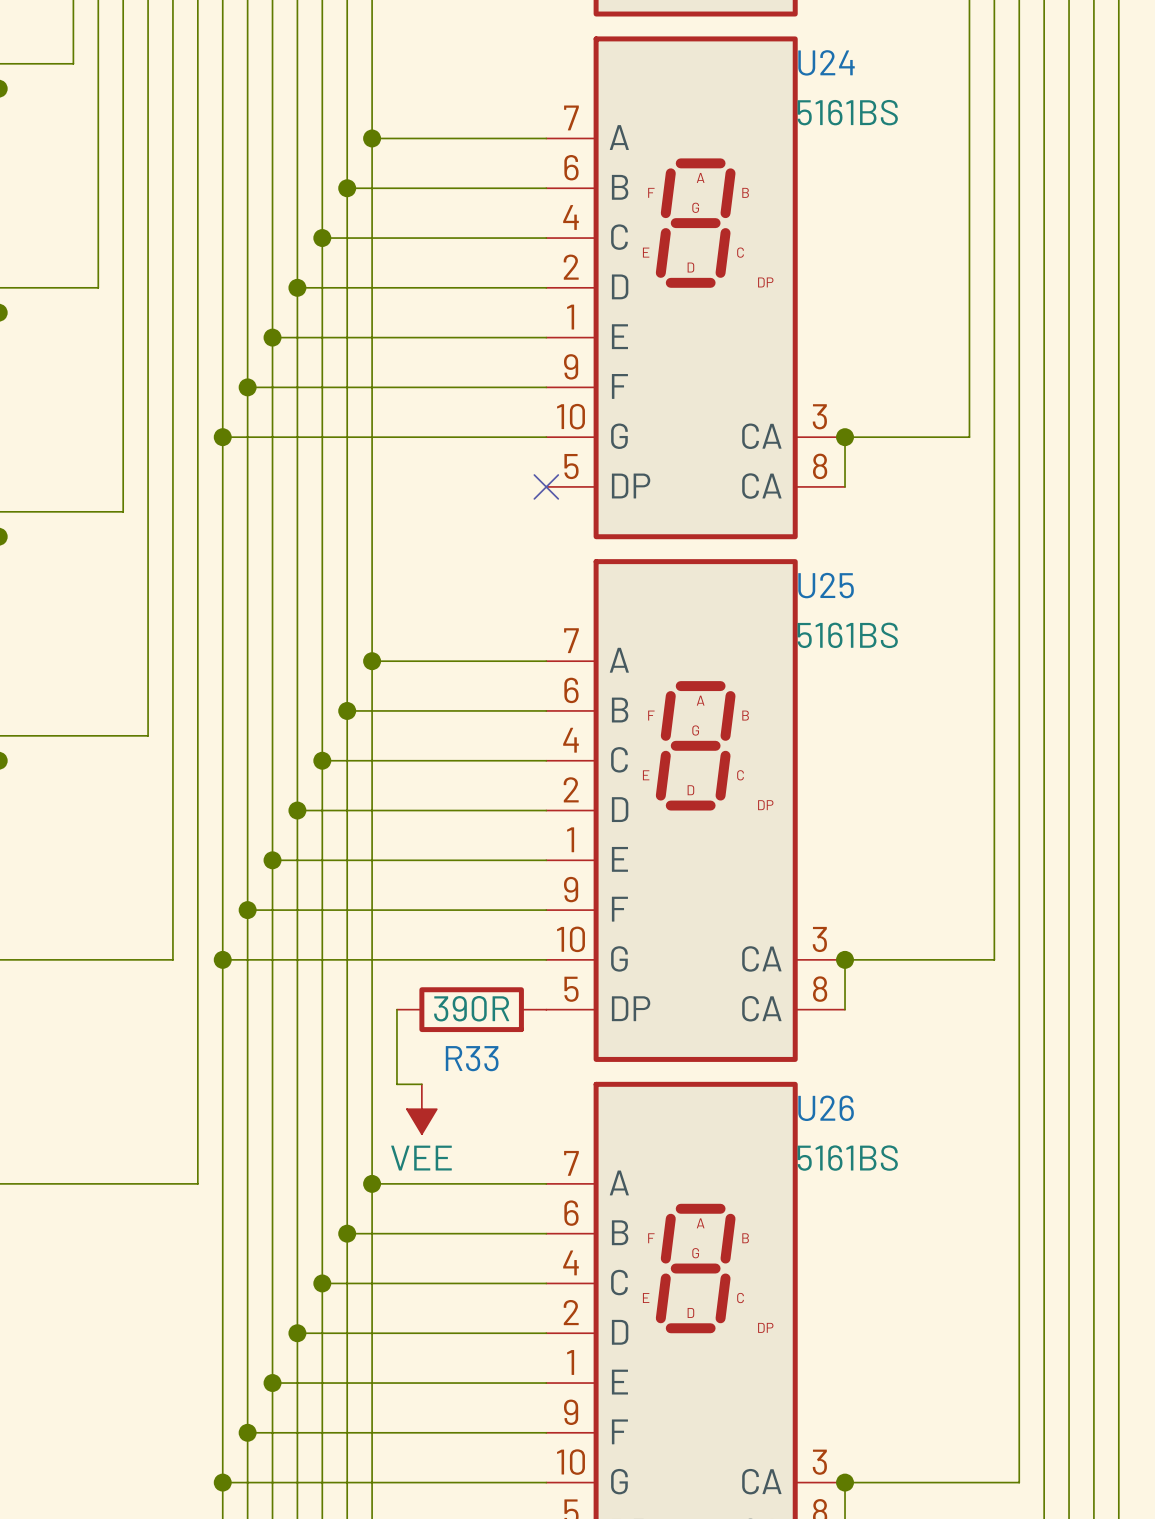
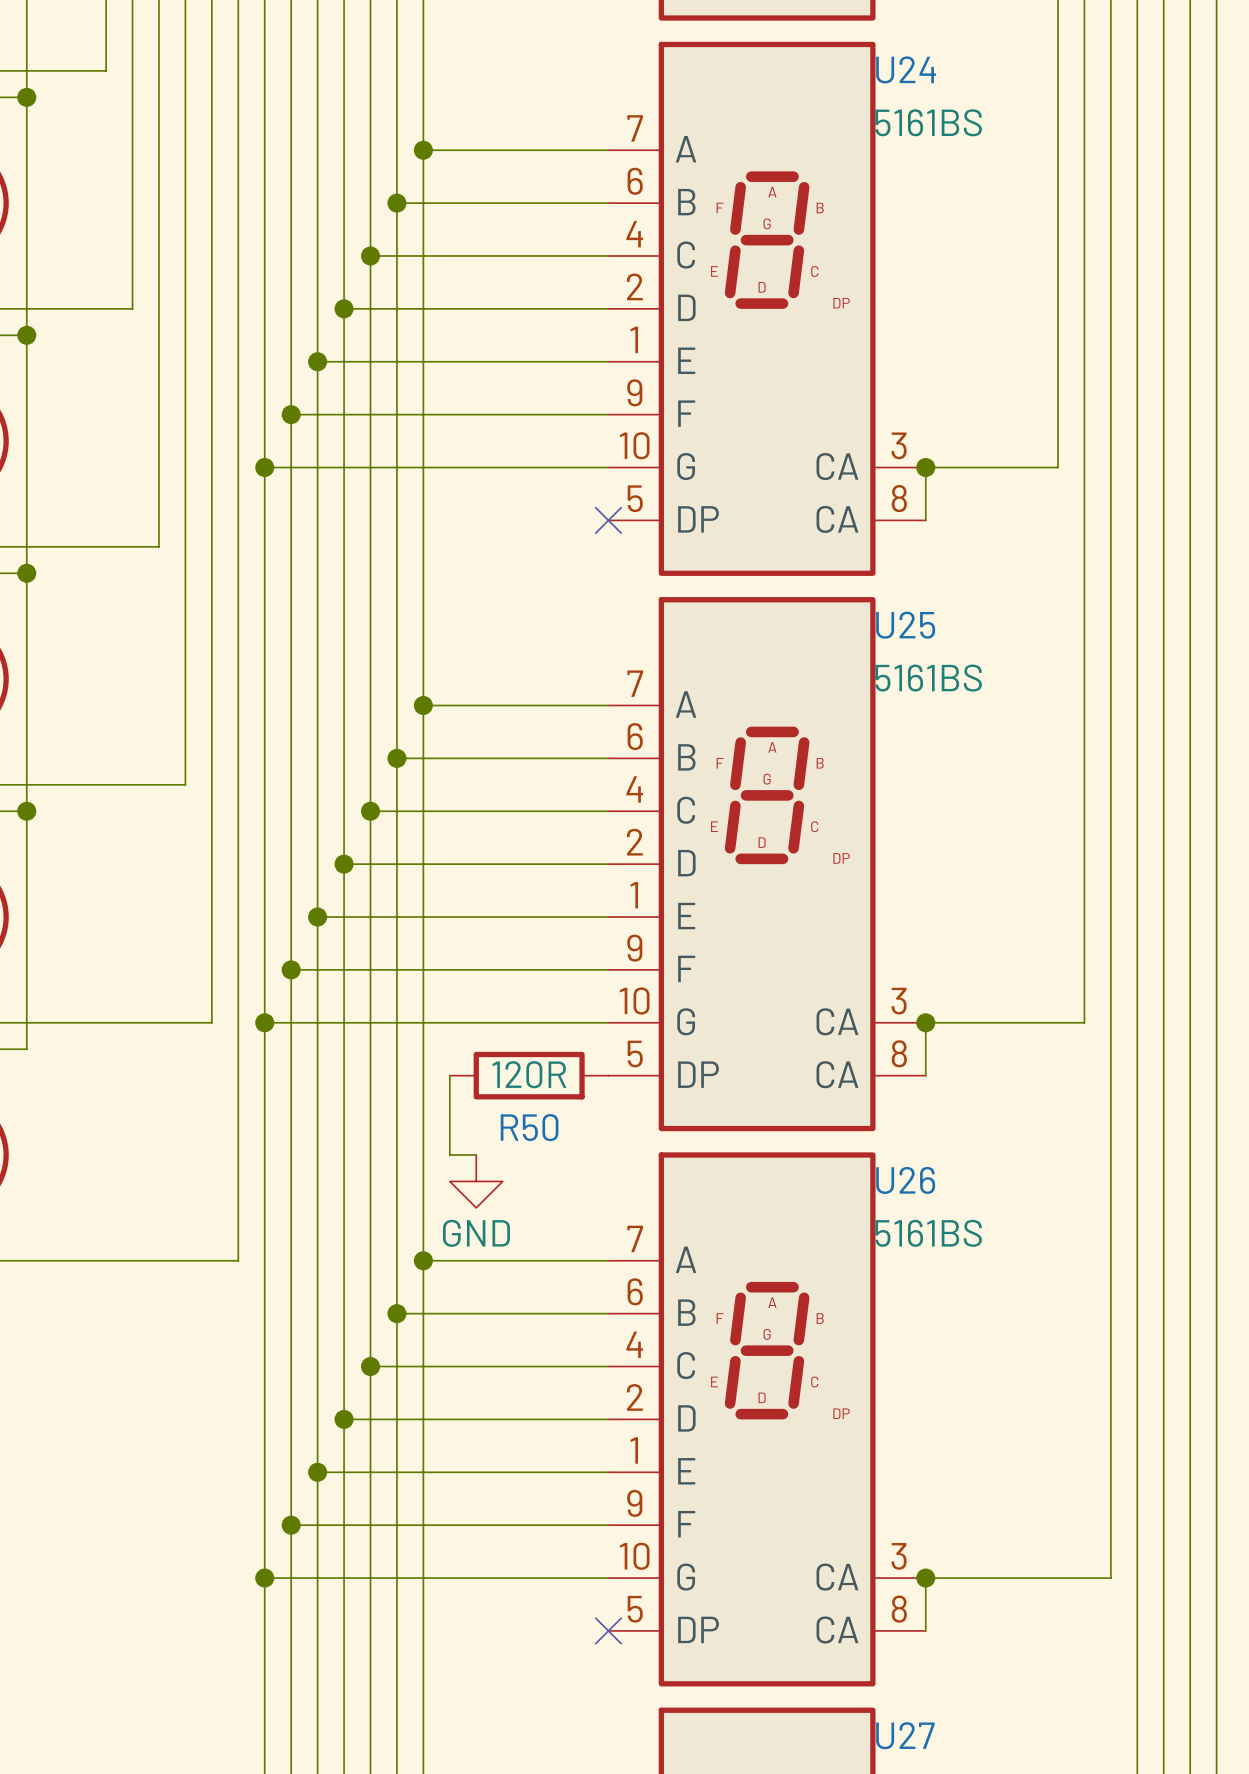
R33 value: 390R (471, 1008) -> 120R (529, 1074)
R33 name: R33 (472, 1058) -> R50 (529, 1127)
power symbol: VEE (421, 1109) -> GND (476, 1181)

